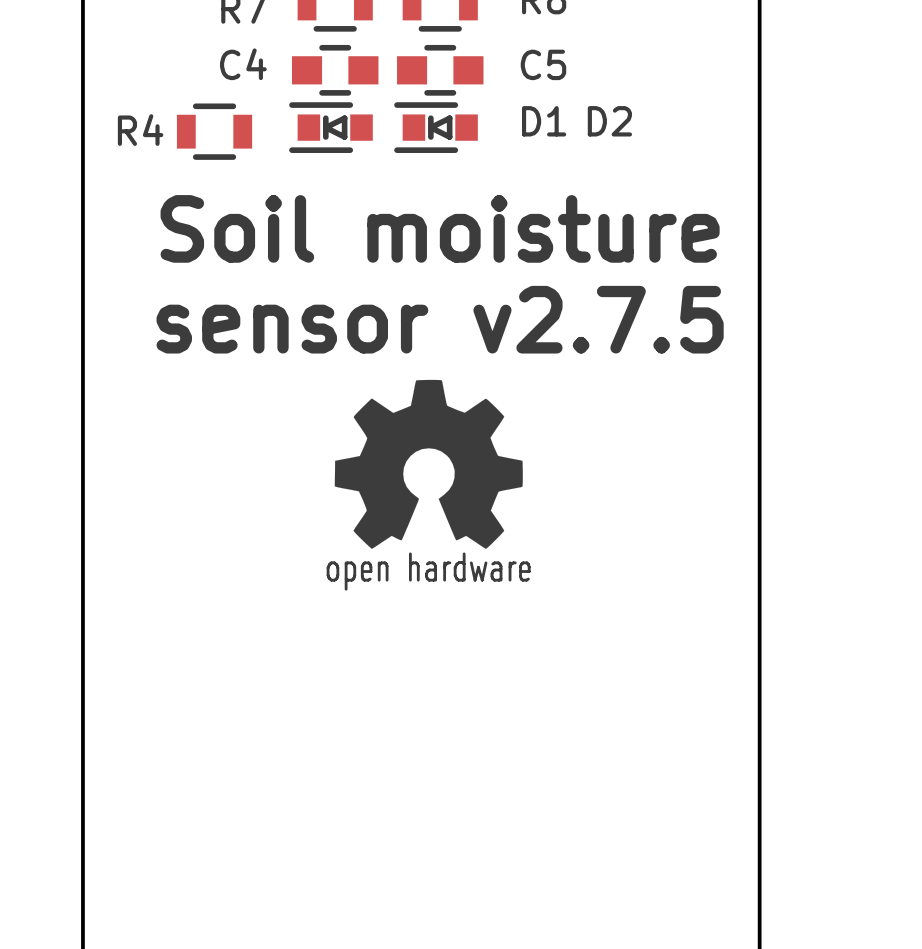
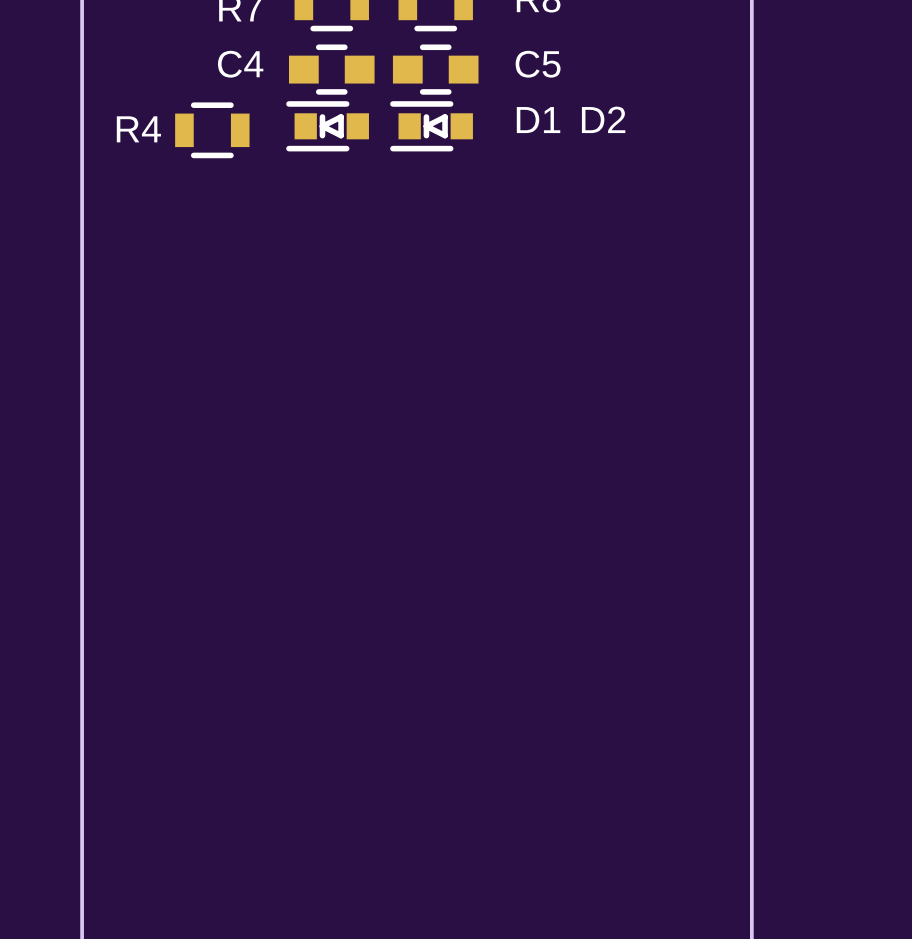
text: Soil moisture (440, 228) -> none
text: sensor v2.7.5 (440, 319) -> none
drawing: [326, 379, 531, 591] -> none

